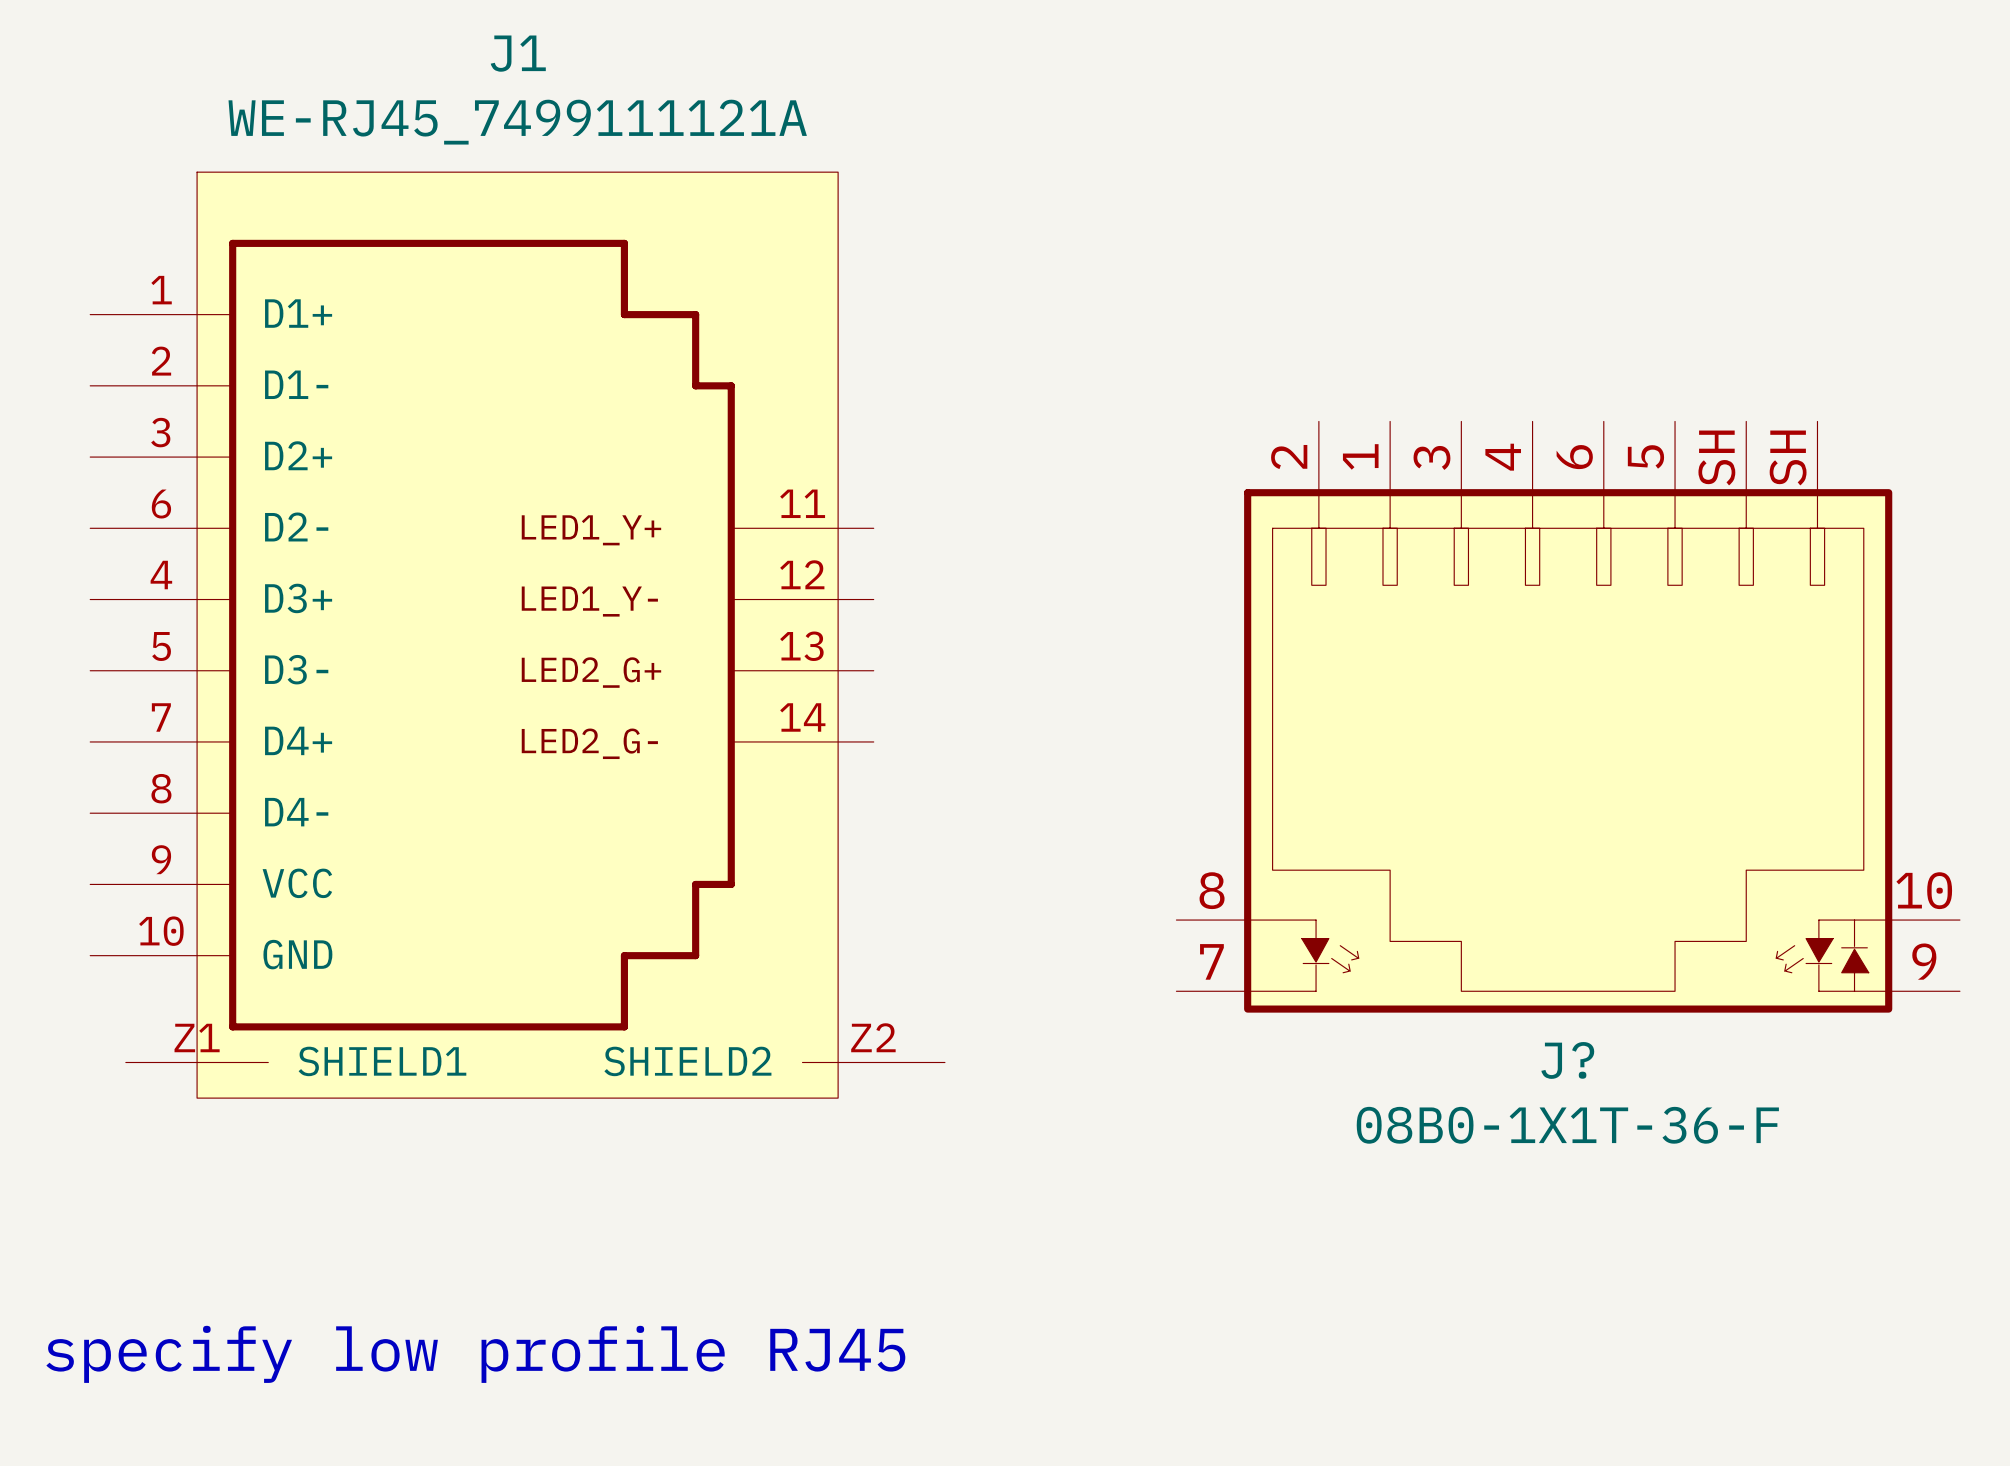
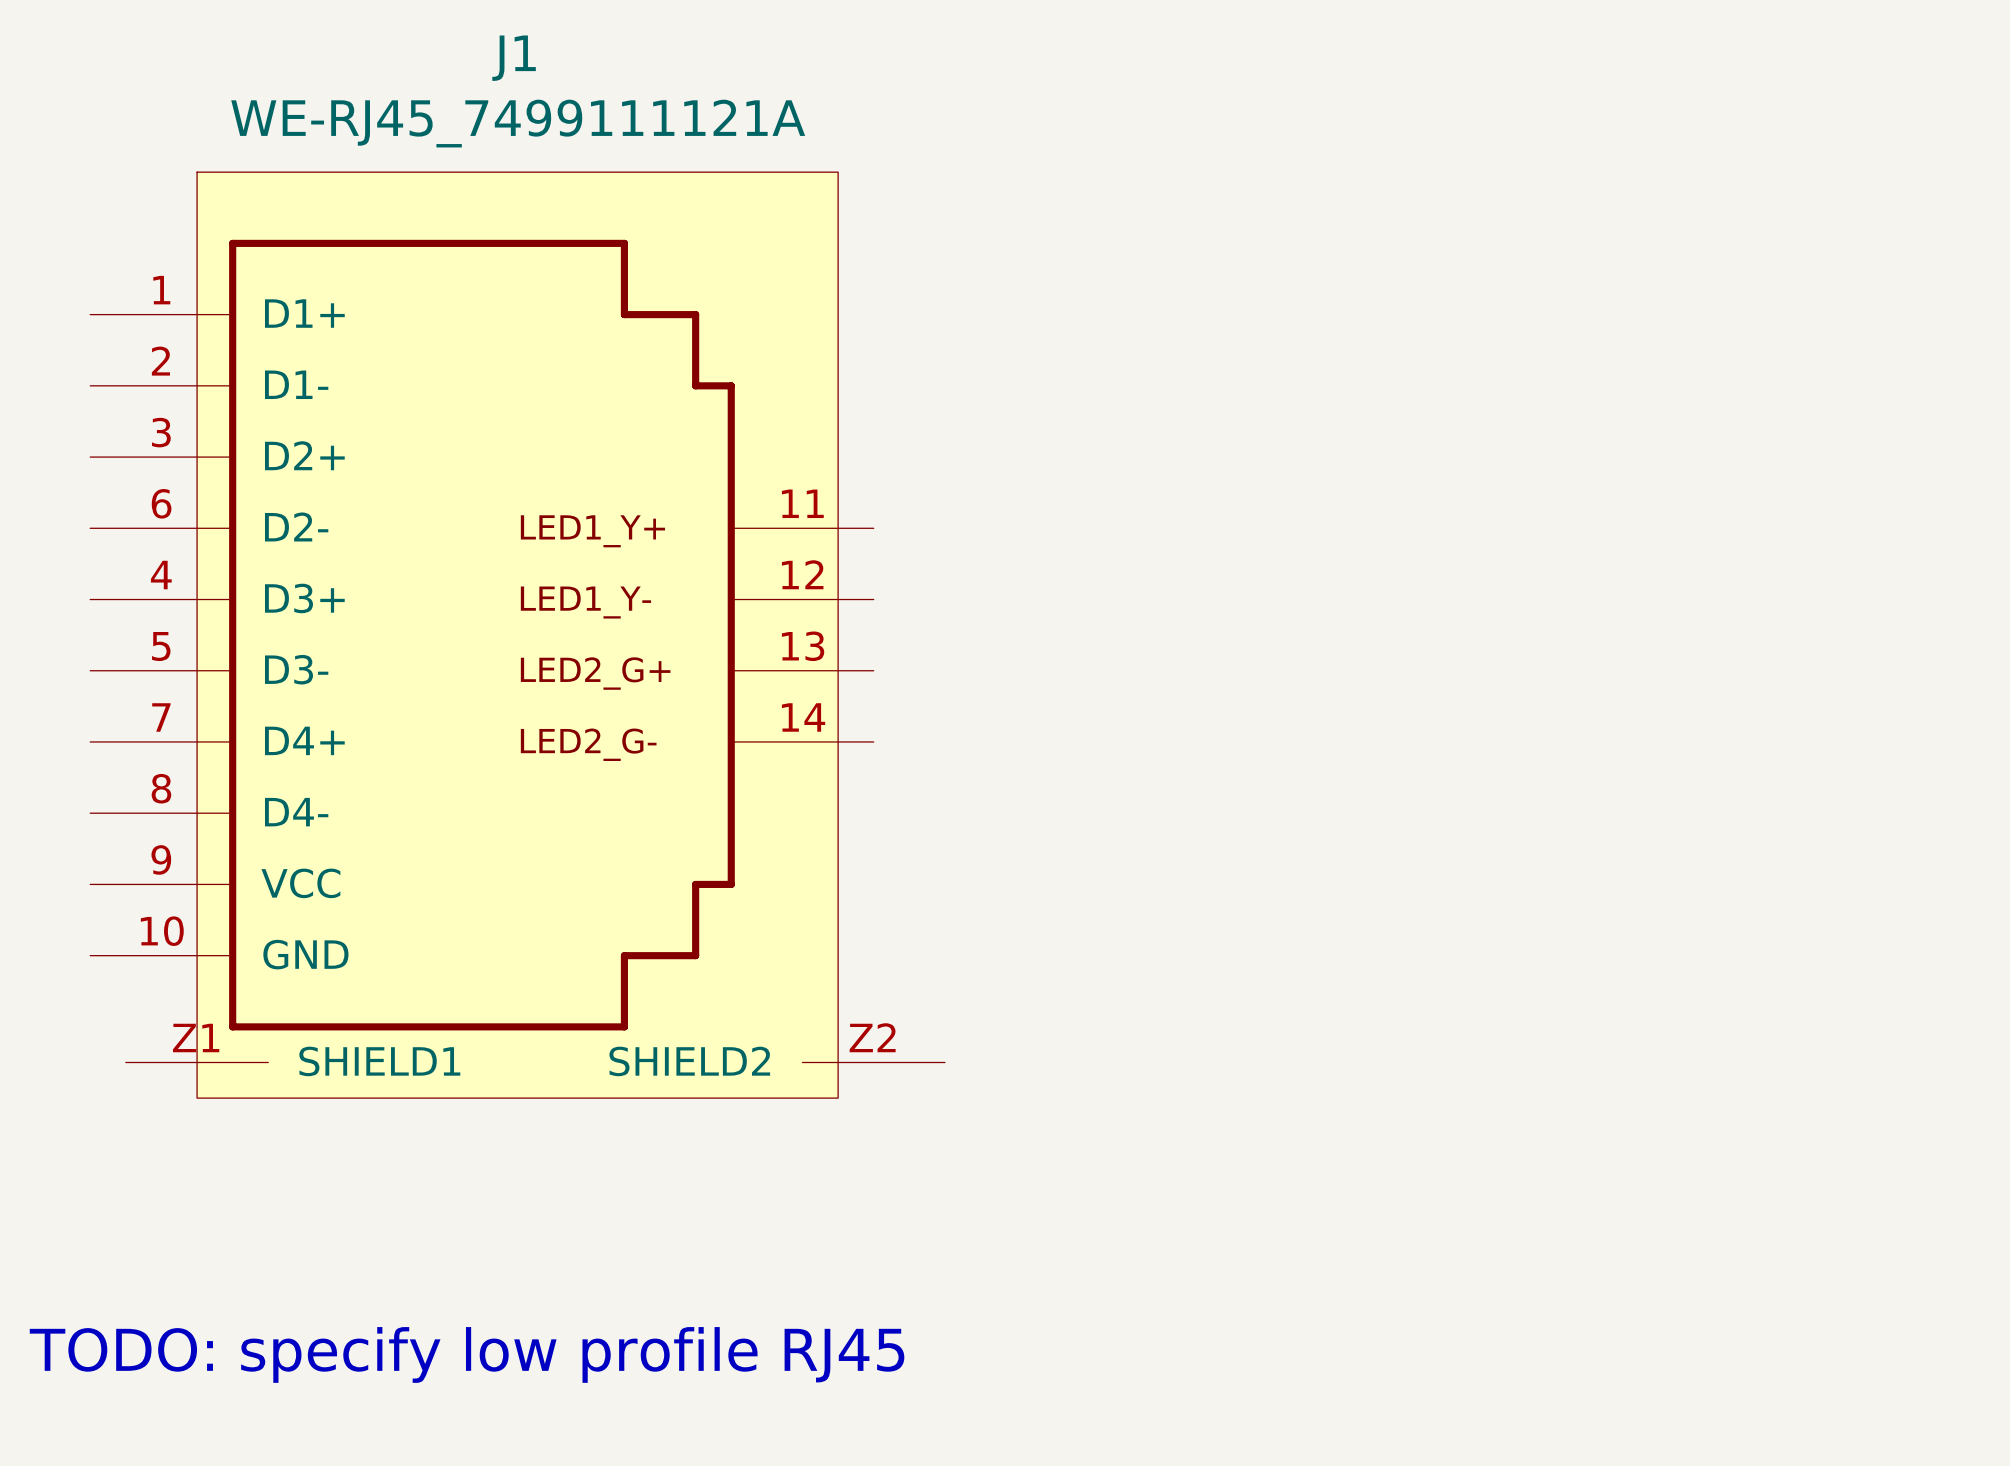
J?: 08B0-1X1T-36-F (1568, 717) -> none

